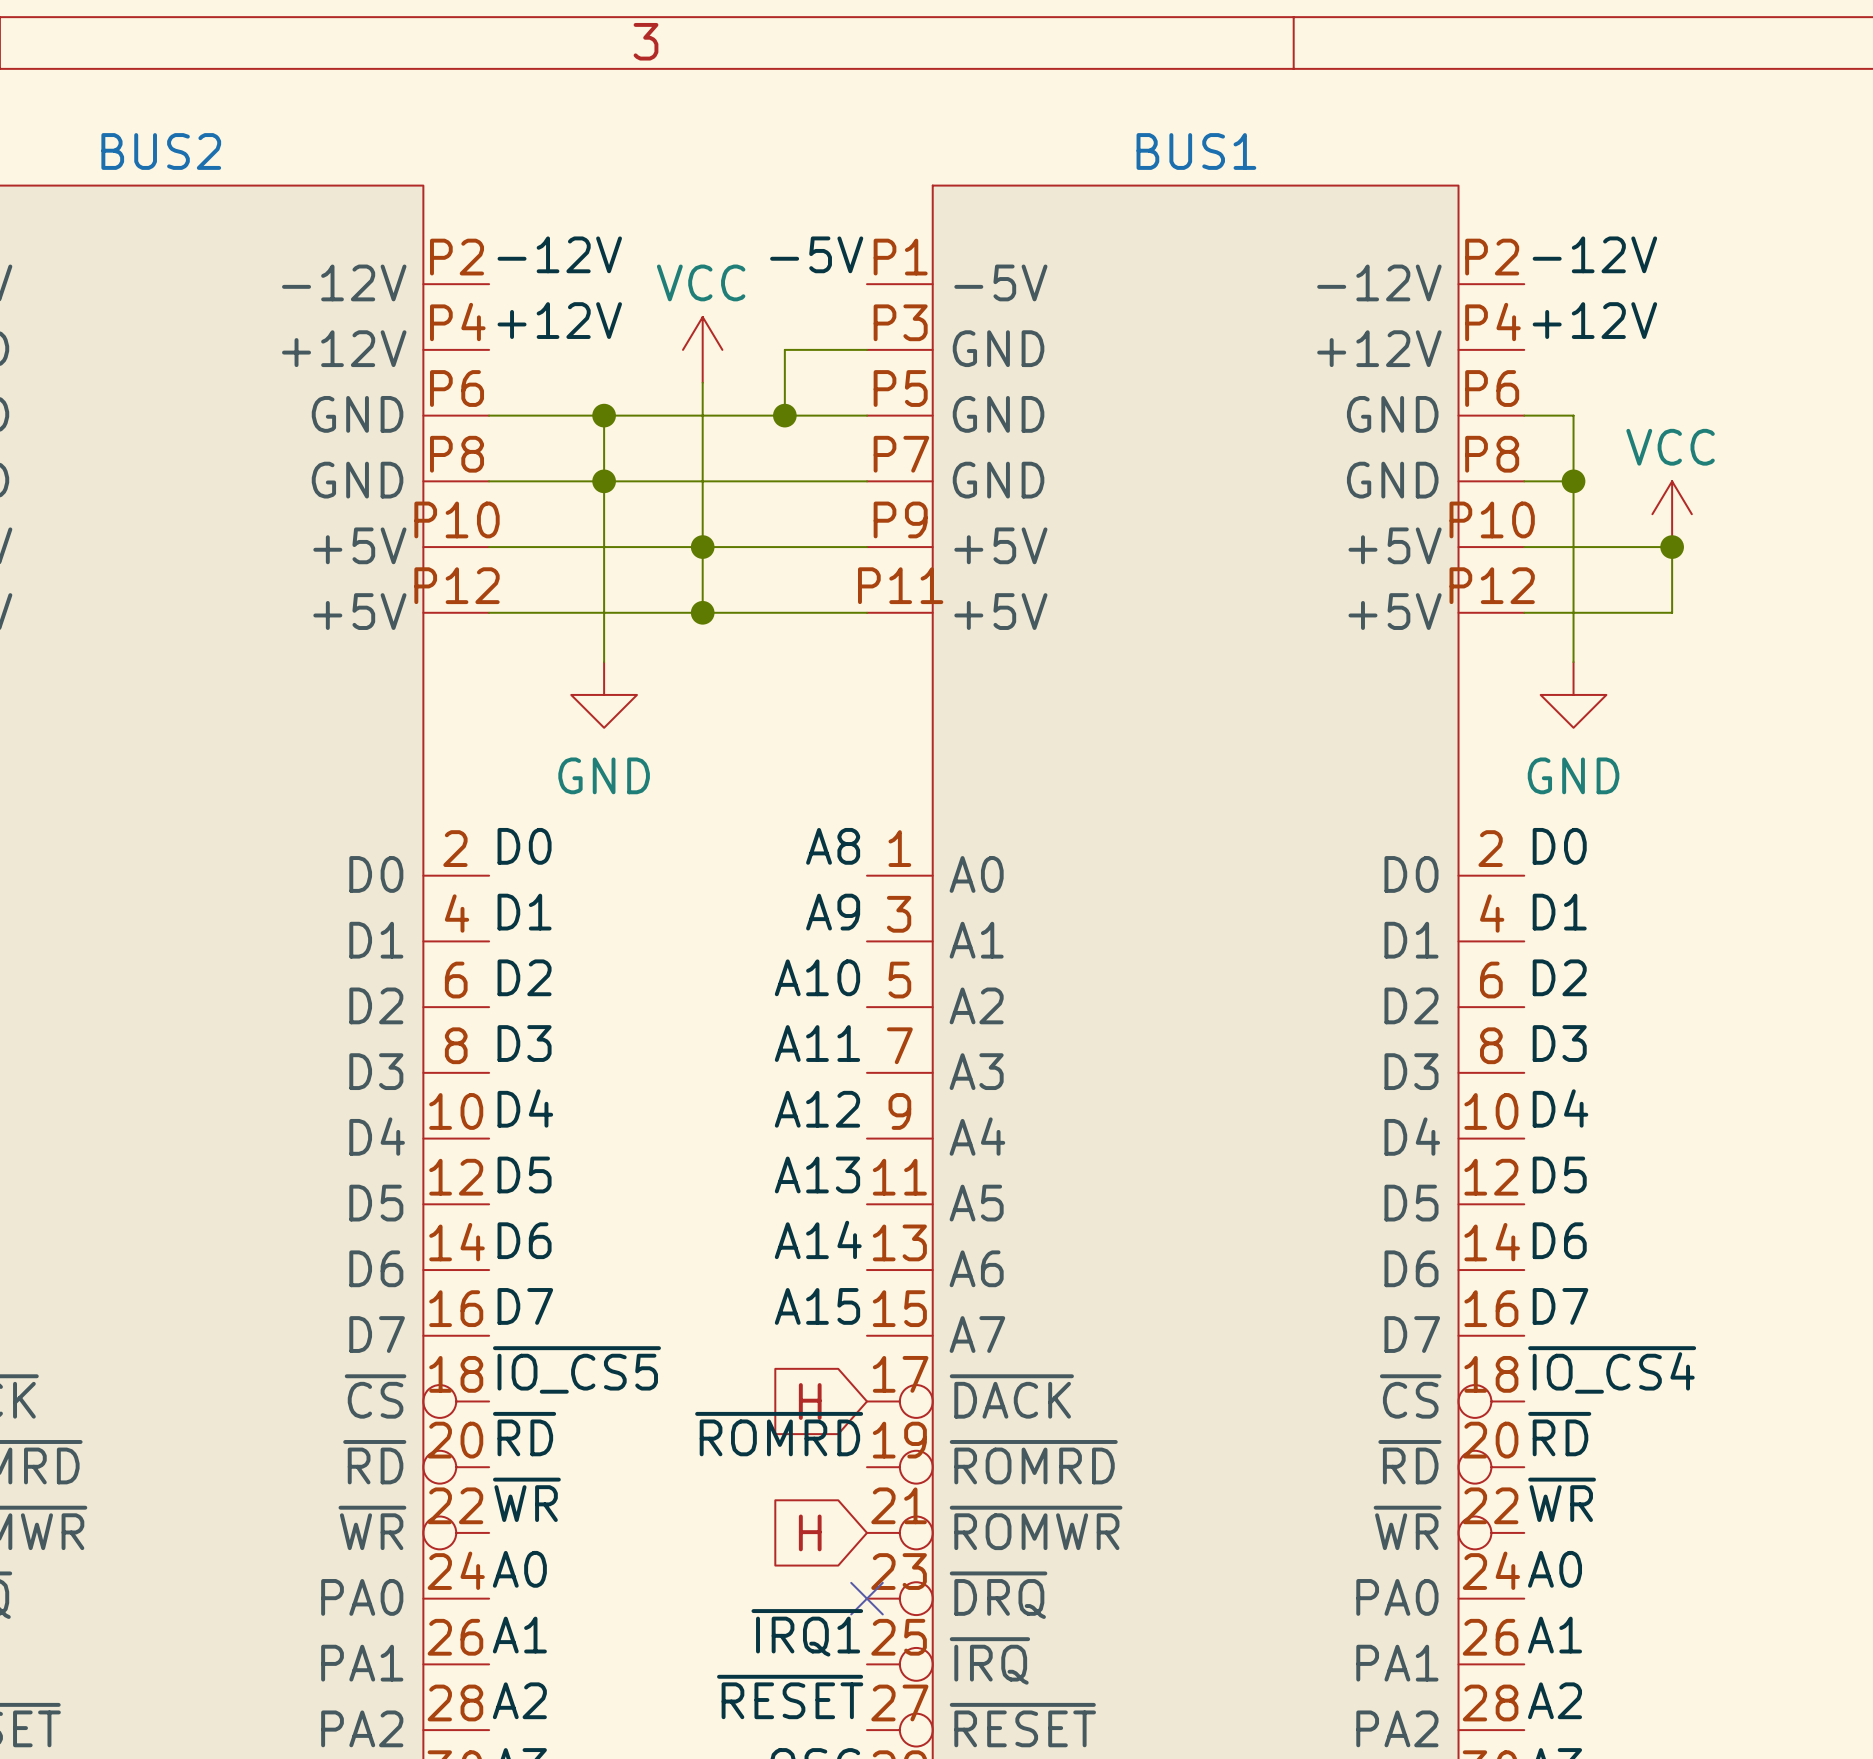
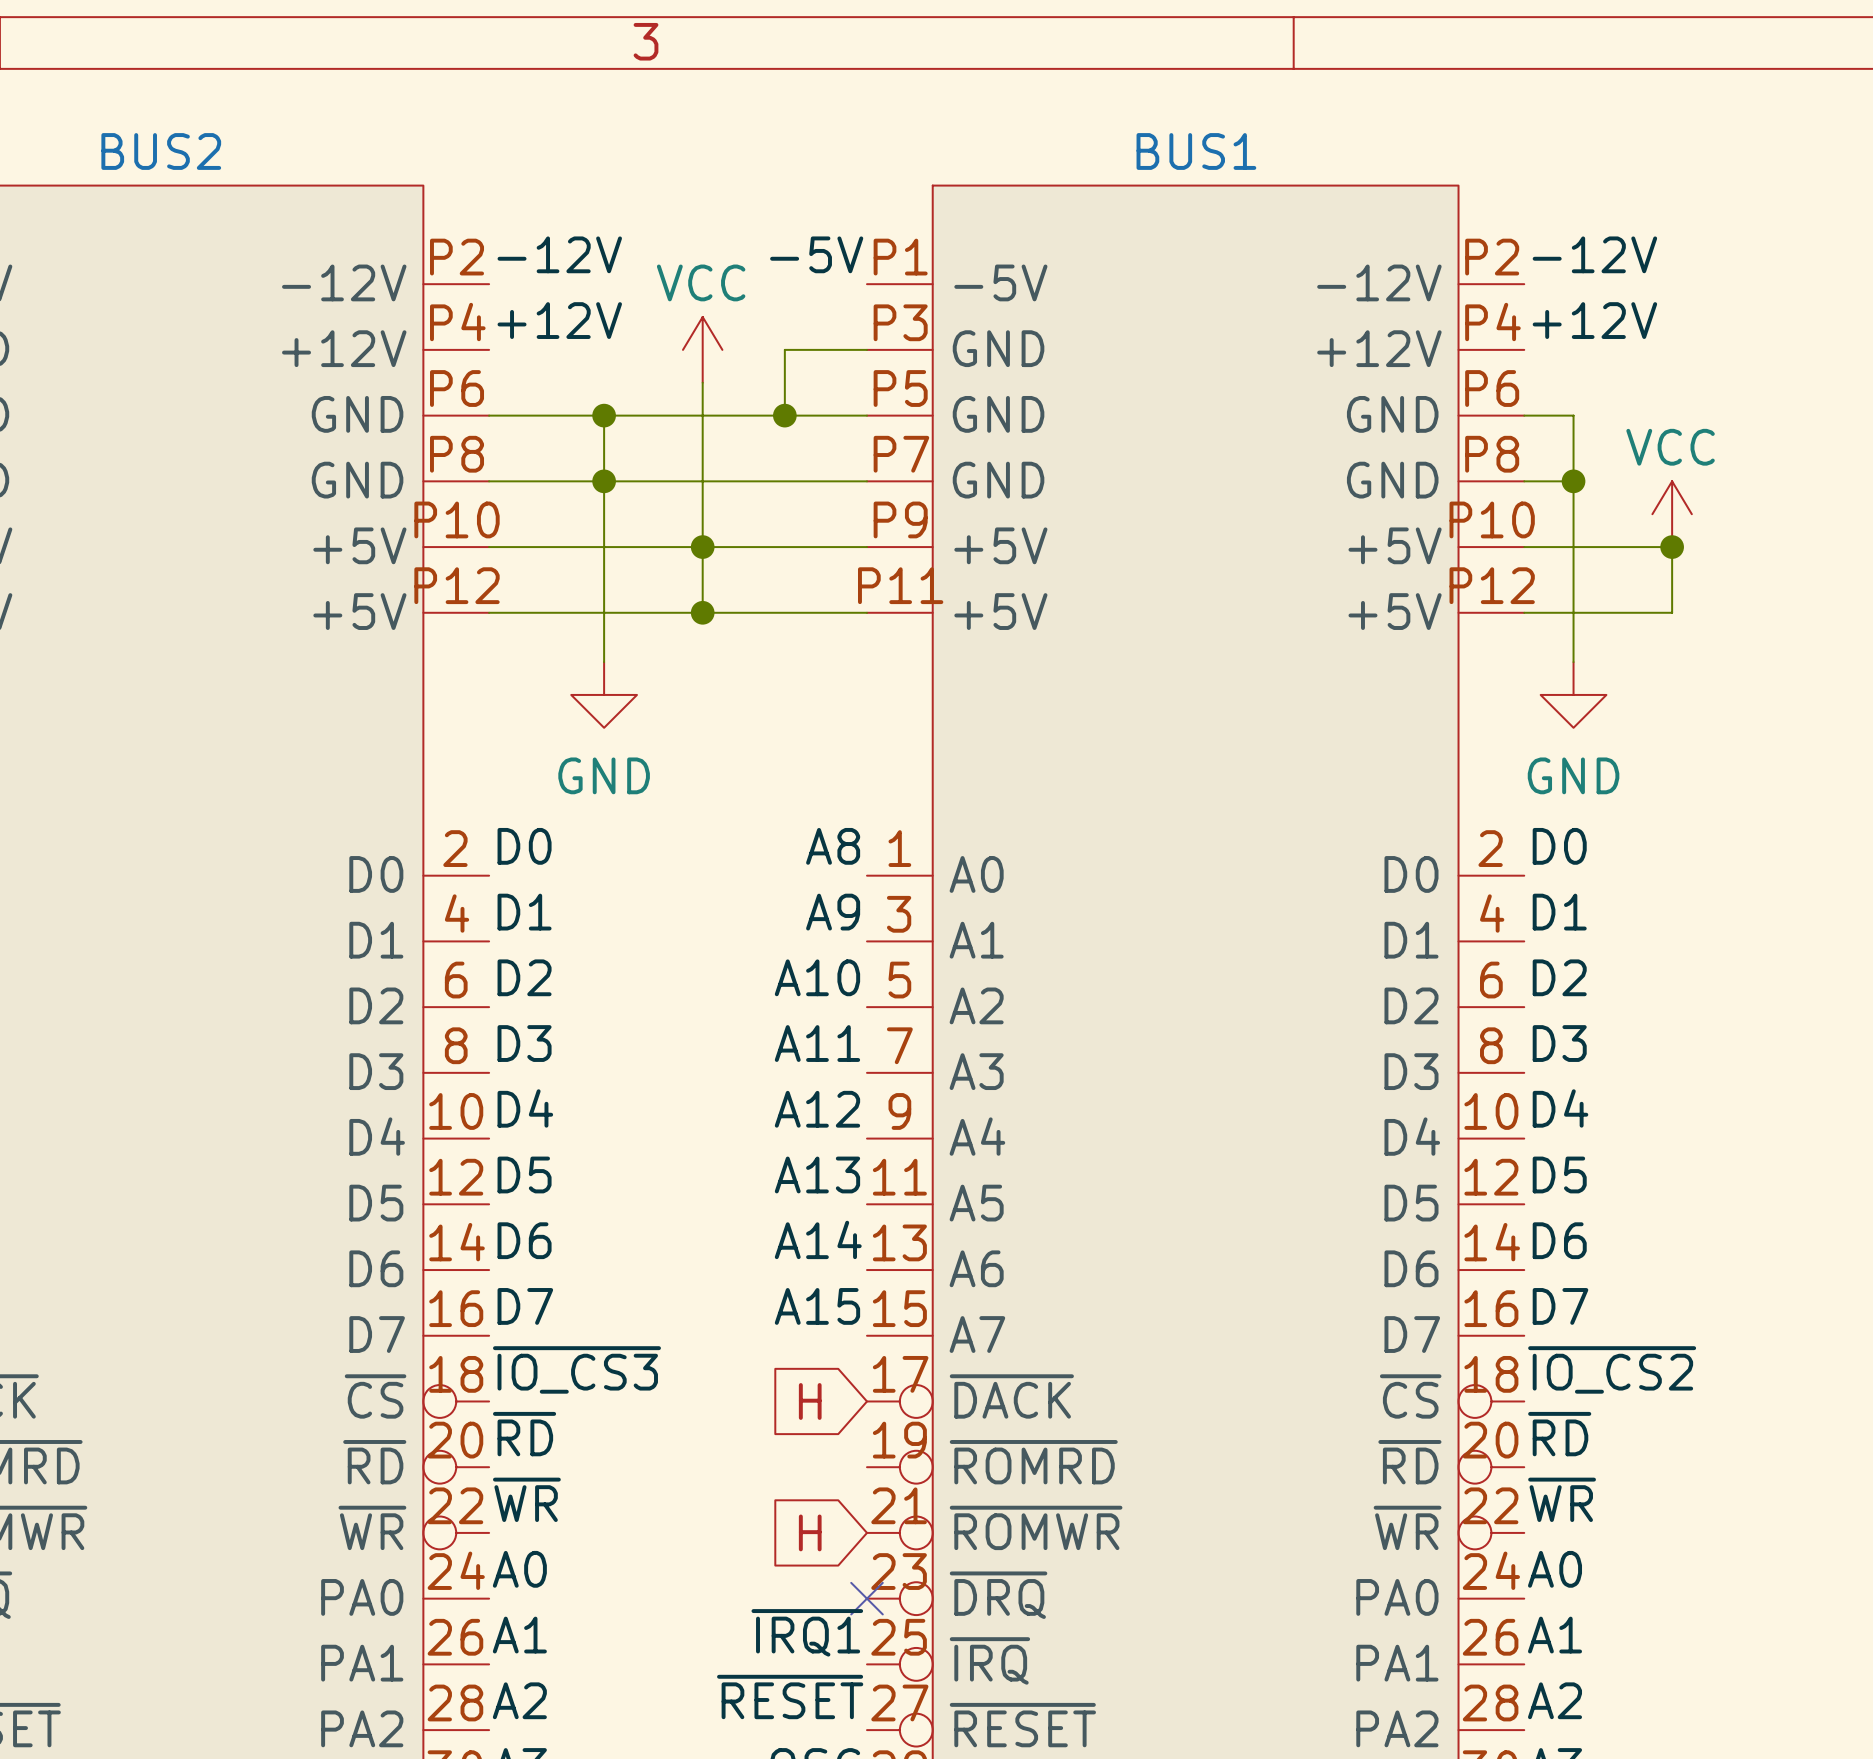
label: ~{IO_CS5} (576, 1369) -> ~{IO_CS3} (576, 1369)
label: ~{IO_CS4} (1612, 1369) -> ~{IO_CS2} (1612, 1369)
label: ~{ROMRD} (779, 1434) -> none

